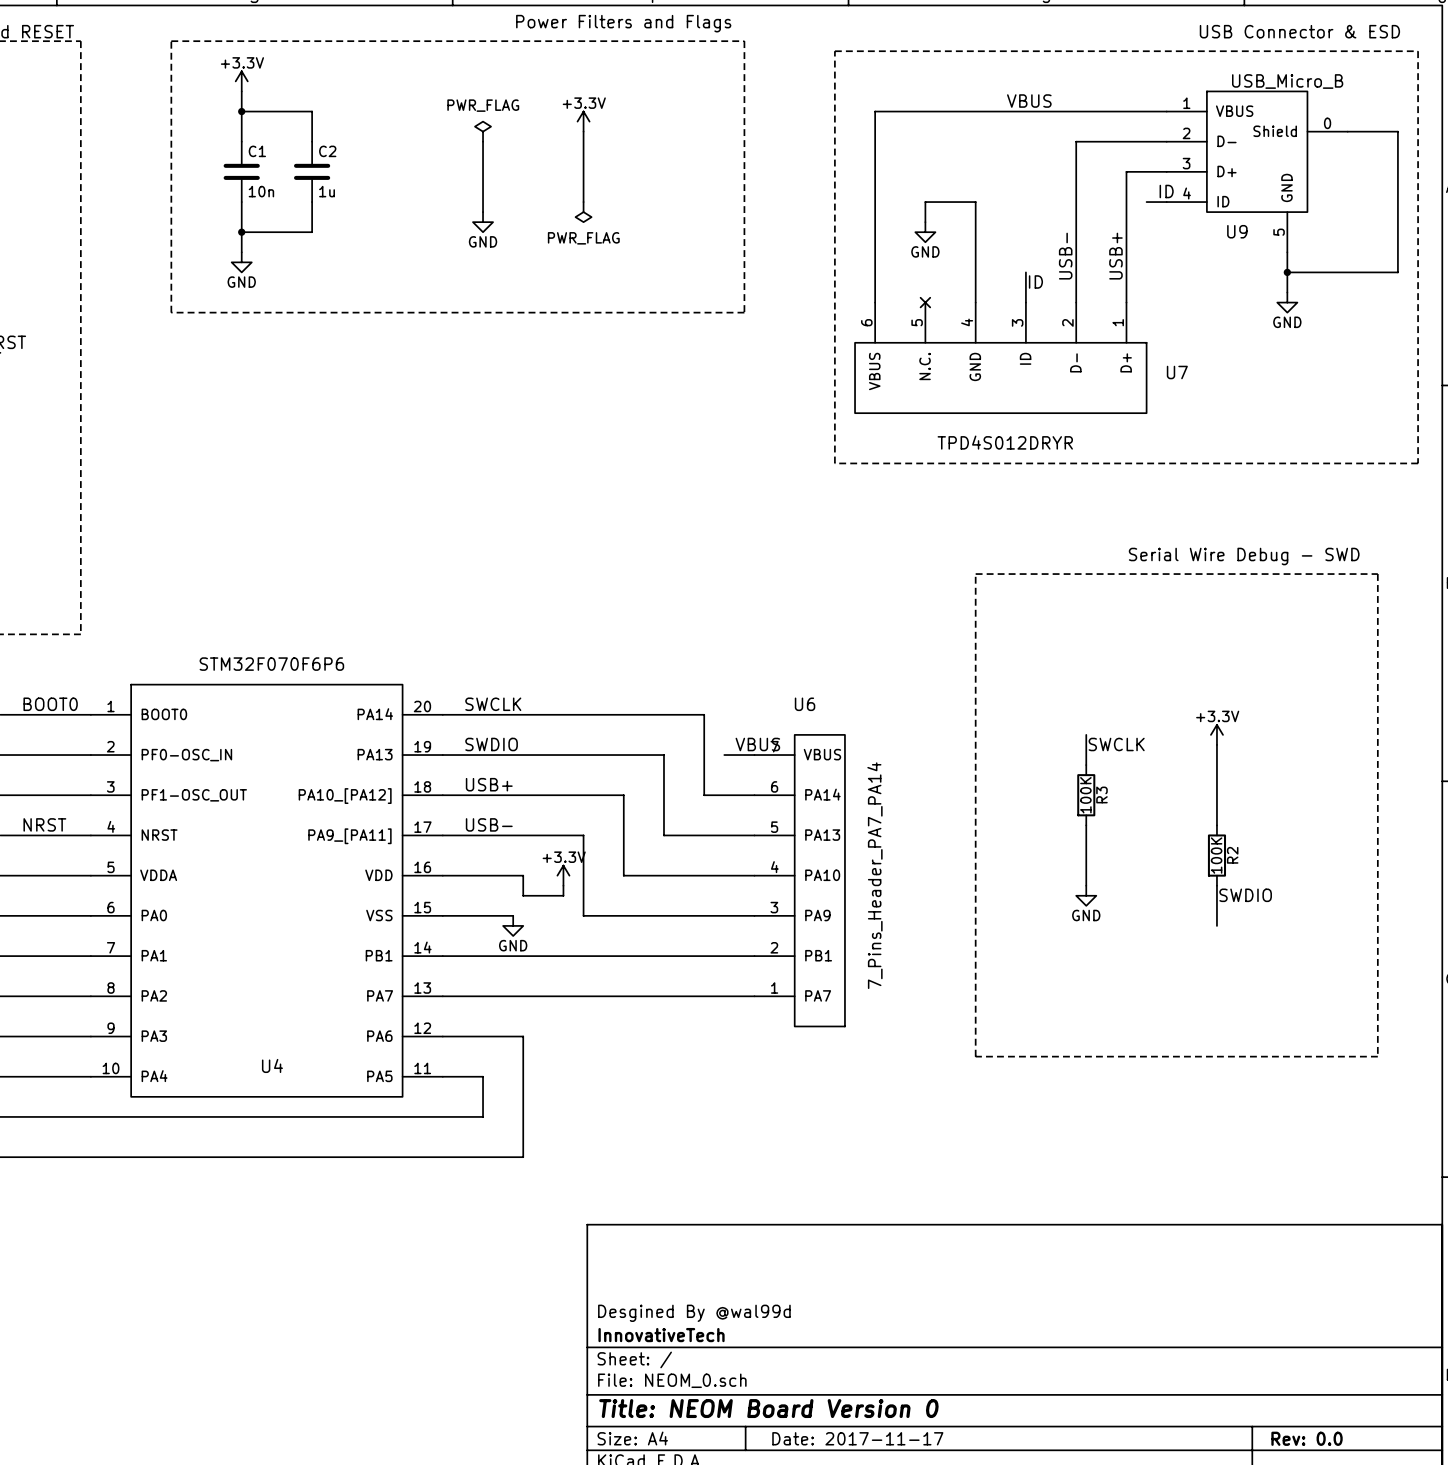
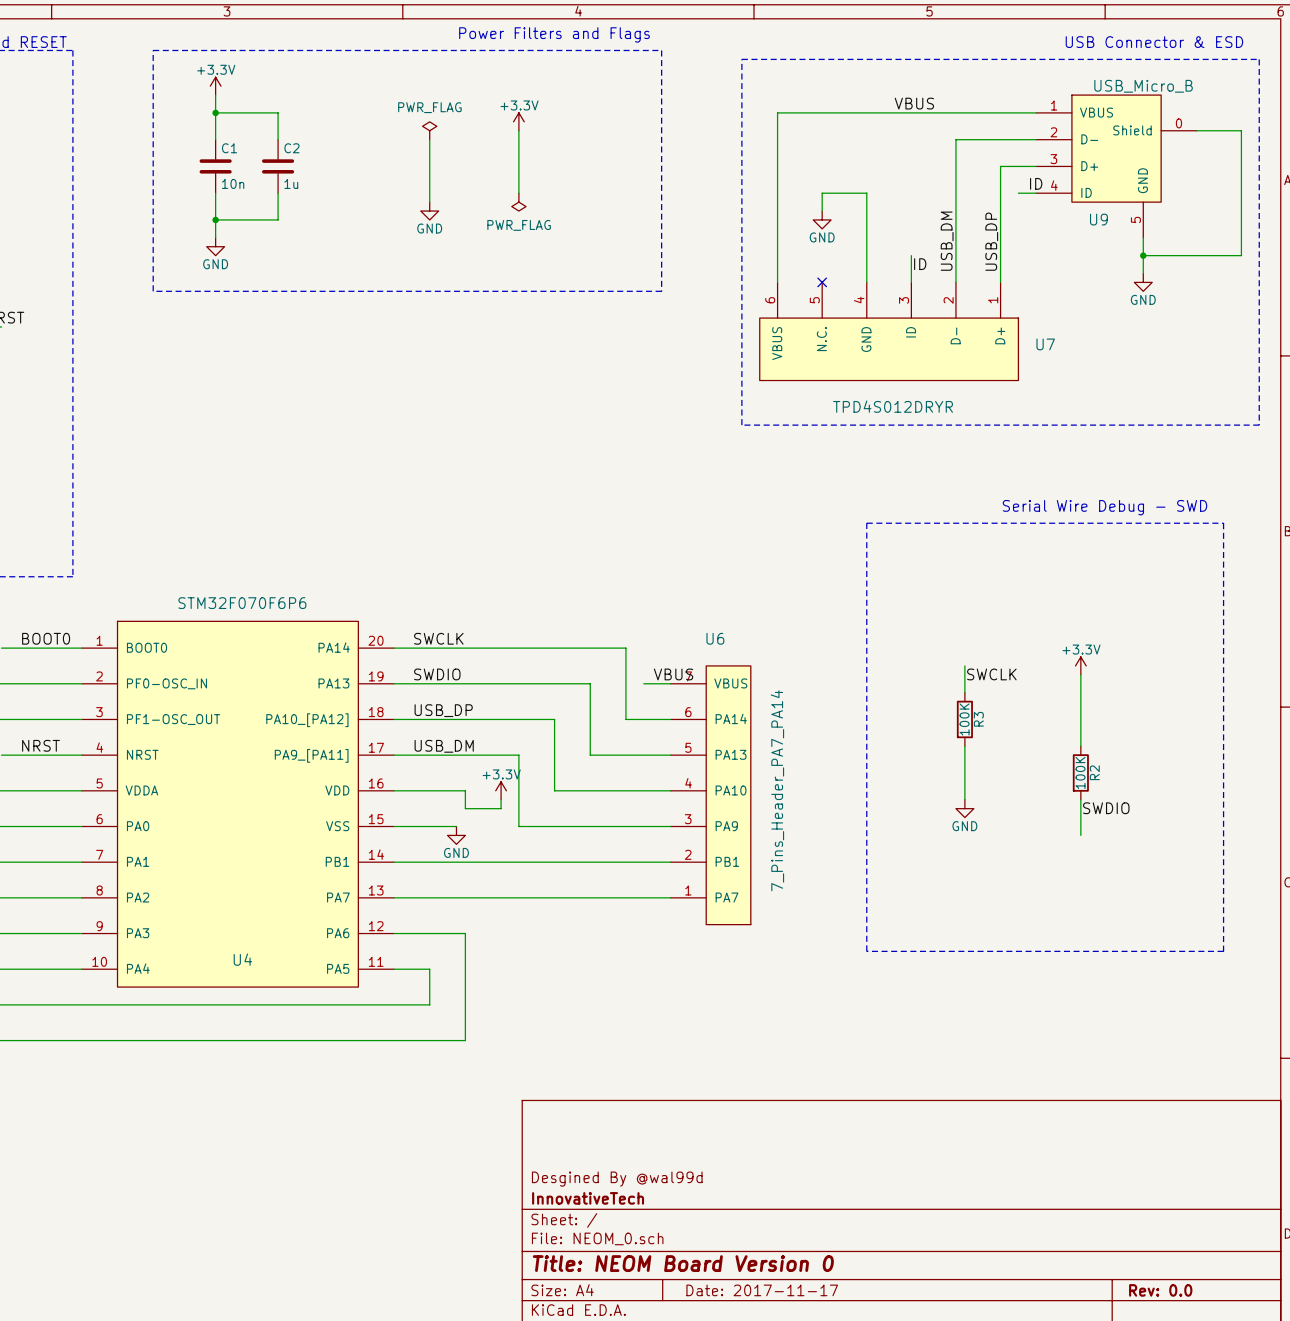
label: USB- (1065, 256) -> none
label: none -> USB_DM (947, 241)
label: USB+ (1115, 256) -> none
label: none -> USB_DP (991, 241)
label: USB+ (489, 784) -> USB_DP (443, 710)
label: USB- (489, 824) -> USB_DM (444, 746)

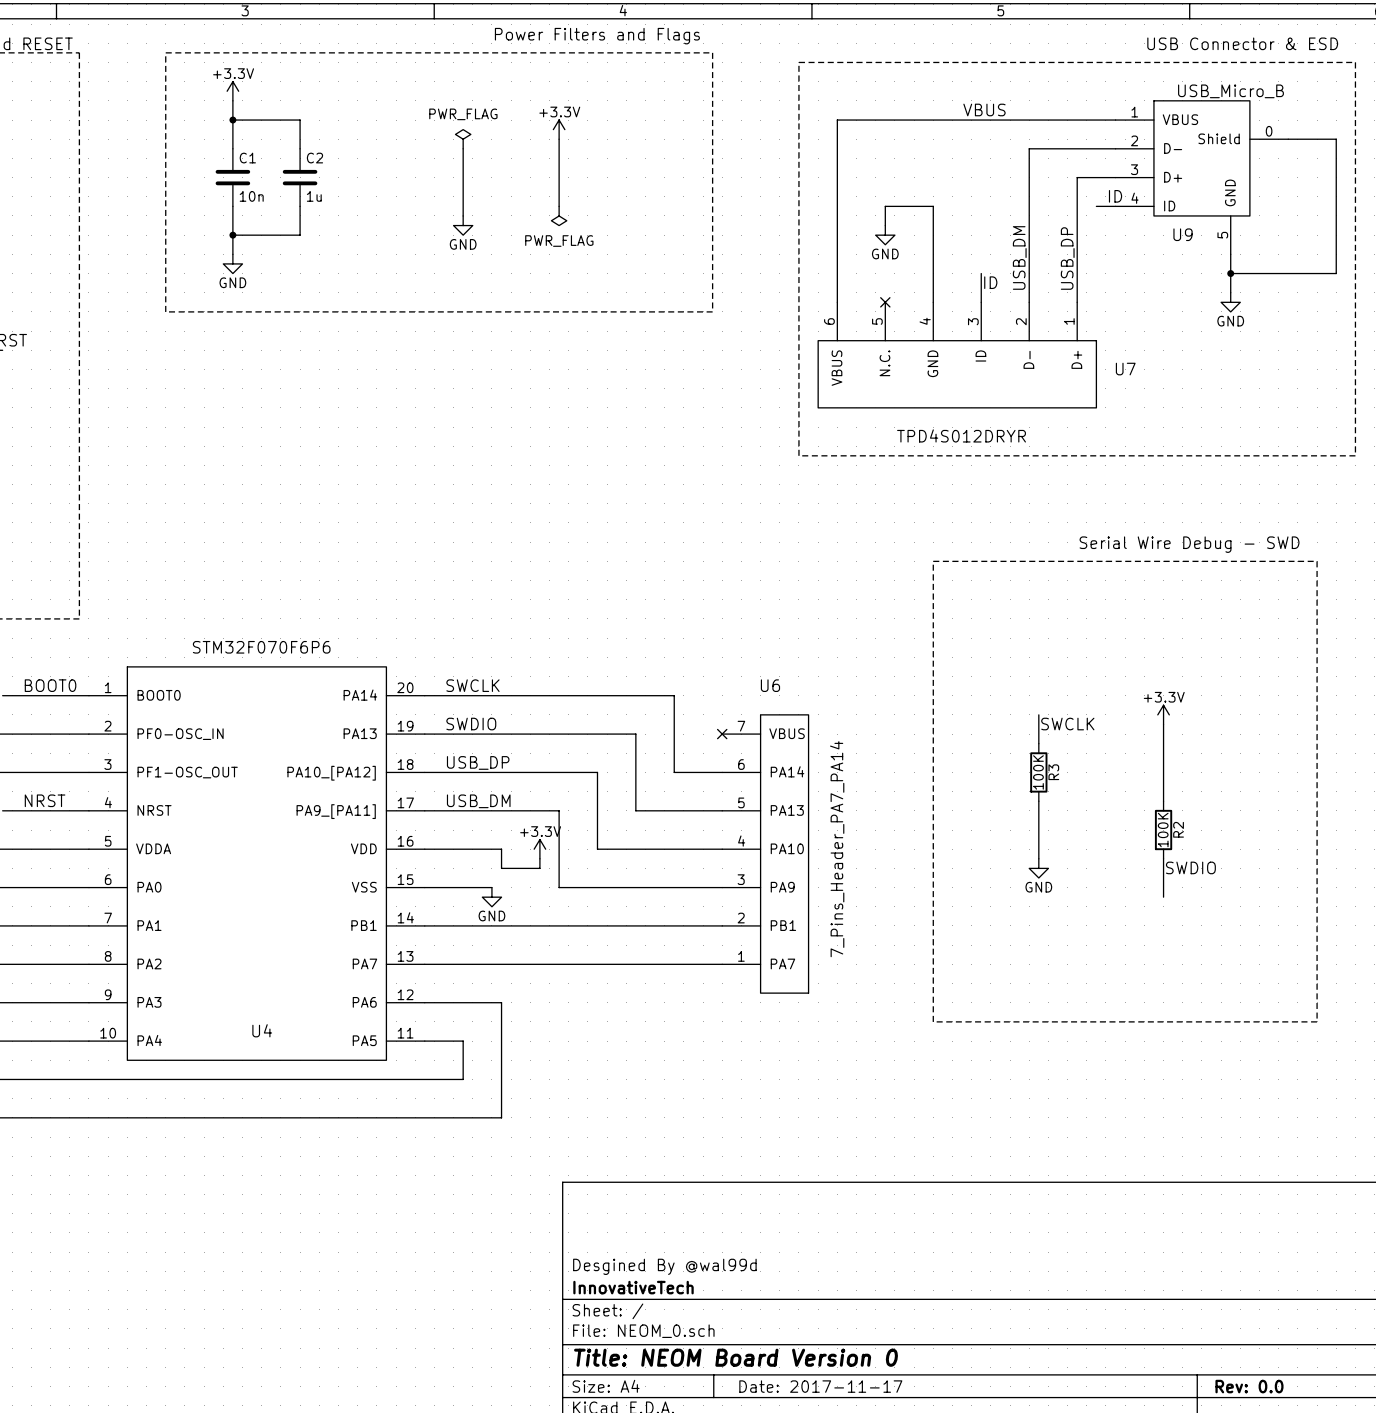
label: VBUS (673, 674) -> none
wire: (643, 683) (670, 683) -> none
no-connect mark: none -> (722, 734)

